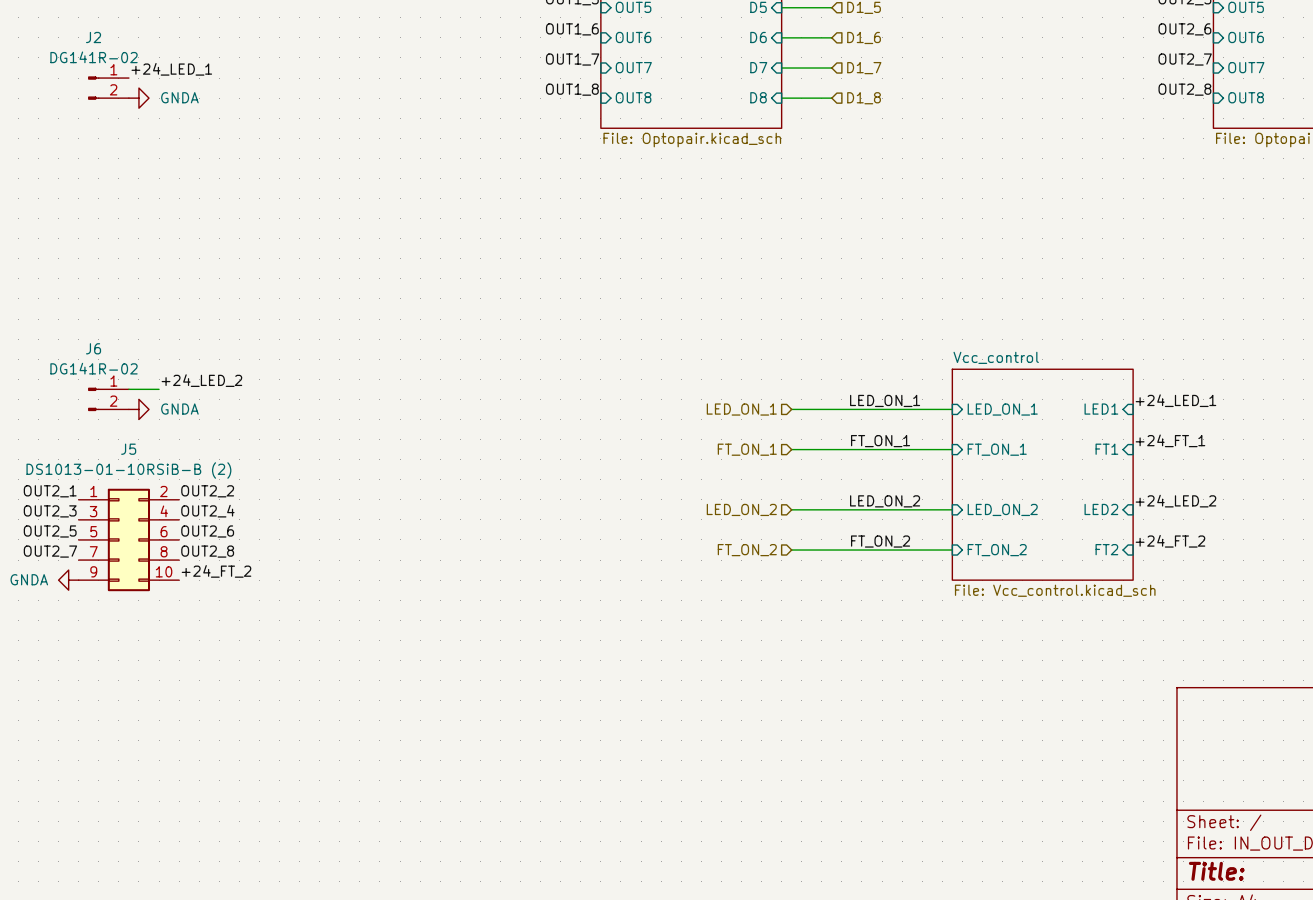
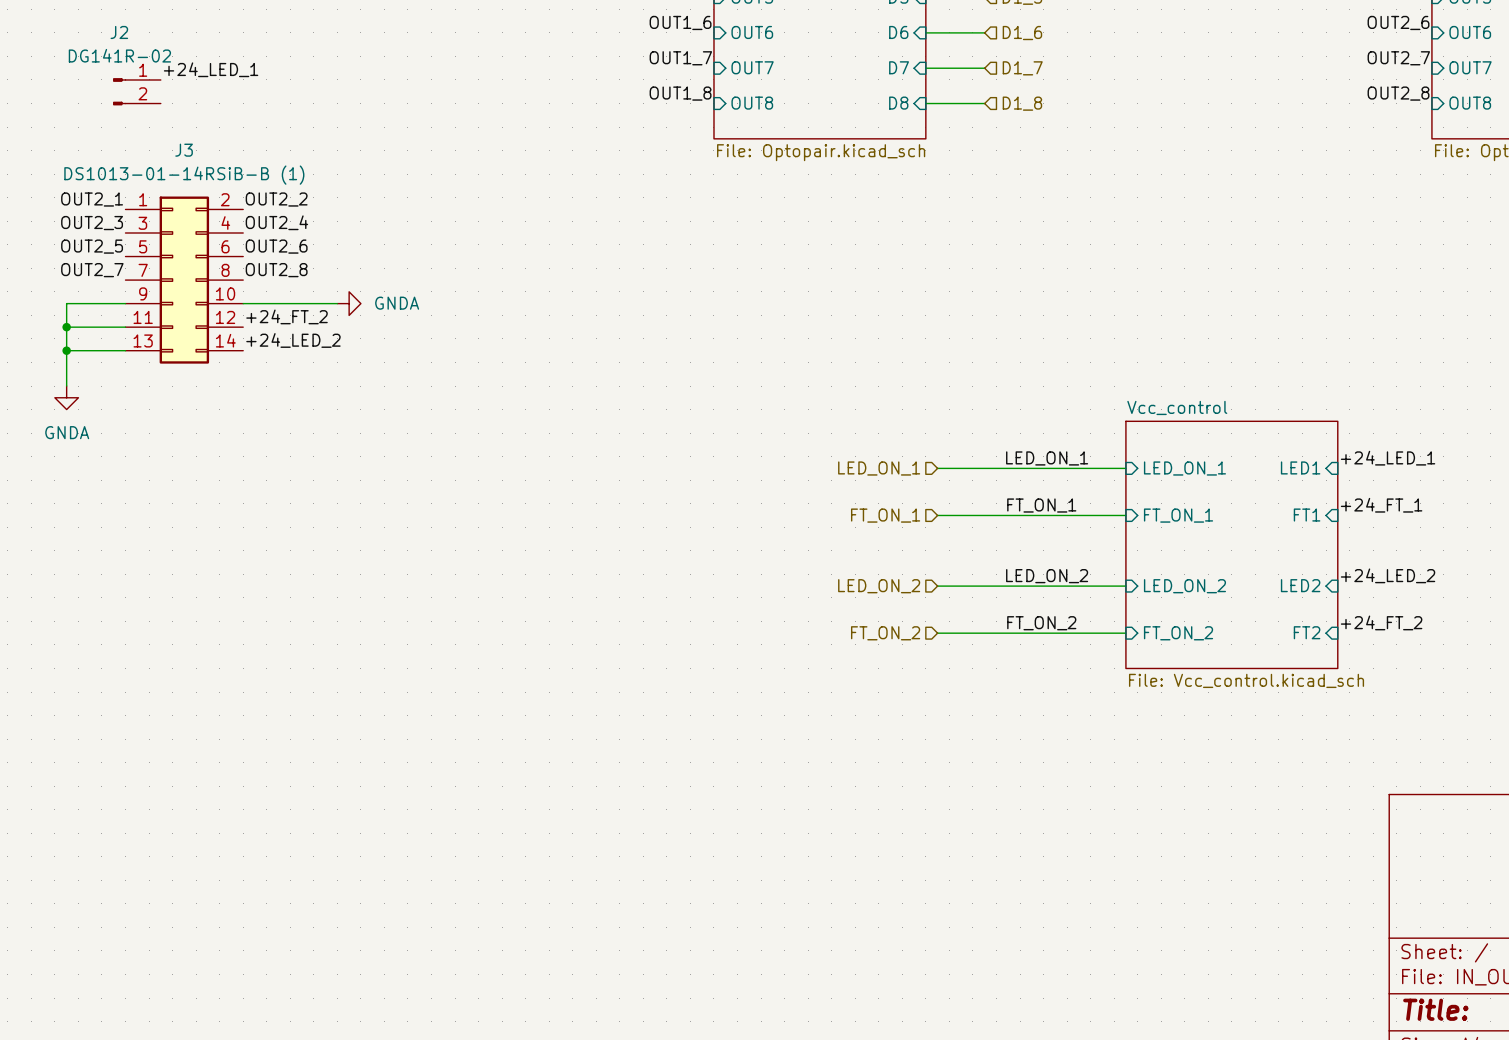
power symbol: GNDA (138, 98) -> none
label: none -> OUT2_1 (92, 199)
label: none -> OUT2_2 (276, 199)
label: none -> OUT2_4 (276, 222)
label: none -> OUT2_3 (92, 223)
label: none -> OUT2_5 (92, 246)
label: none -> OUT2_6 (276, 246)
label: none -> OUT2_7 (92, 270)
label: none -> OUT2_8 (276, 270)
J3: none -> DS1013-01-14RSiB-B (1) (184, 280)
wire: none -> (125, 303) (66, 303) (66, 386)
wire: none -> (243, 303) (337, 303)
power symbol: none -> GNDA (349, 303)
label: none -> +24_FT_2 (287, 316)
wire: none -> (66, 327) (125, 327)
junction: none -> (66, 327)
wire: none -> (66, 350) (125, 350)
junction: none -> (66, 350)
power symbol: none -> GNDA (66, 397)
label position: +24_LED_2 (201, 380) -> +24_LED_2 (293, 340)
wire: (128, 389) (159, 389) -> none
J6: DG141R-02 (108, 399) -> none
power symbol: GNDA (138, 409) -> none
label: OUT2_1 (50, 491) -> none
label: OUT2_2 (207, 491) -> none
label: OUT2_3 (50, 511) -> none
label: OUT2_4 (207, 511) -> none
label: OUT2_5 (50, 531) -> none
label: OUT2_6 (207, 531) -> none
J5: DS1013-01-10RSiB-B (2) (128, 539) -> none
label: OUT2_7 (50, 551) -> none
label: OUT2_8 (207, 551) -> none
label: +24_FT_2 (216, 571) -> none
power symbol: GNDA (68, 580) -> none

